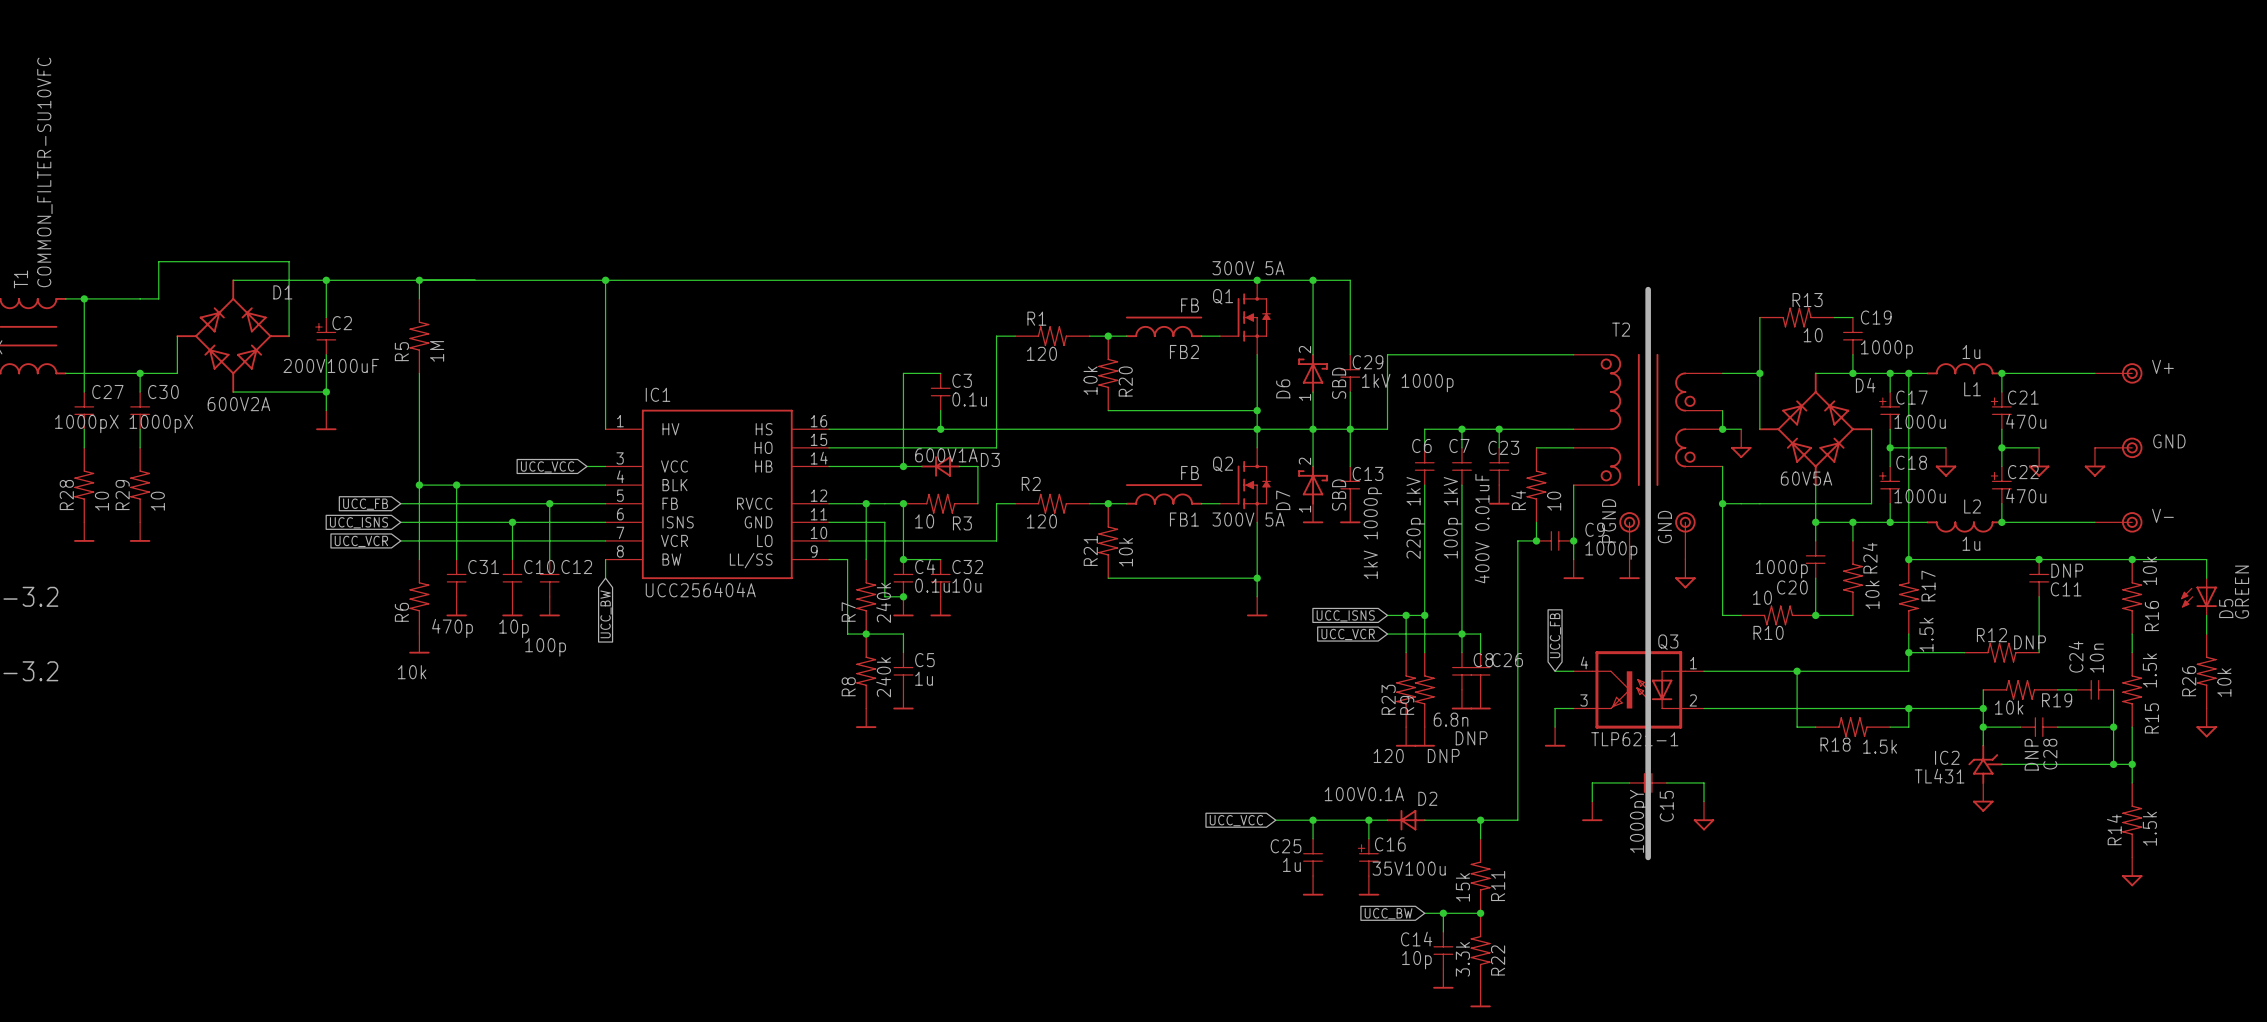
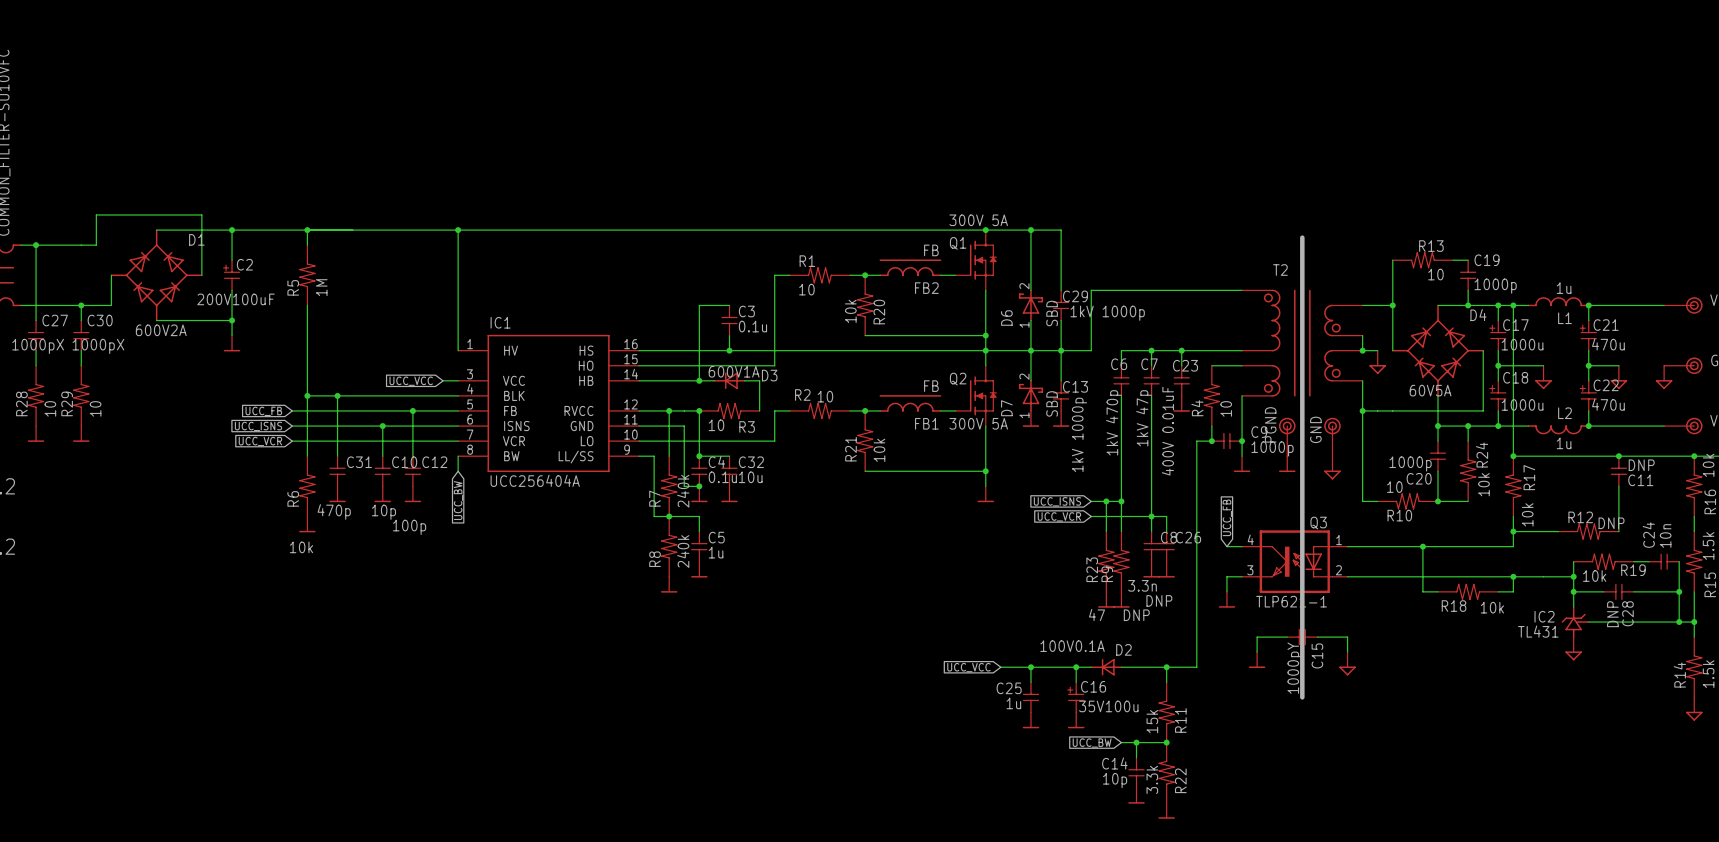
R1 value: 120 (1041, 353) -> 10 (806, 289)
C7 value: 100p 1kV (1452, 517) -> 1kV 47p (1144, 418)
C6 value: 220p 1kV (1415, 518) -> 1kV 470p (1113, 422)
R2 value: 120 (1041, 521) -> 10 (825, 396)
R17 value: 1.5k (1926, 634) -> 10k (1527, 514)
C8 value: 6.8n (1451, 719) -> 3.3n (1142, 585)
R18 value: 1.5k (1880, 746) -> 10k (1492, 607)
R23 value: 120 (1388, 755) -> 47 (1096, 614)

